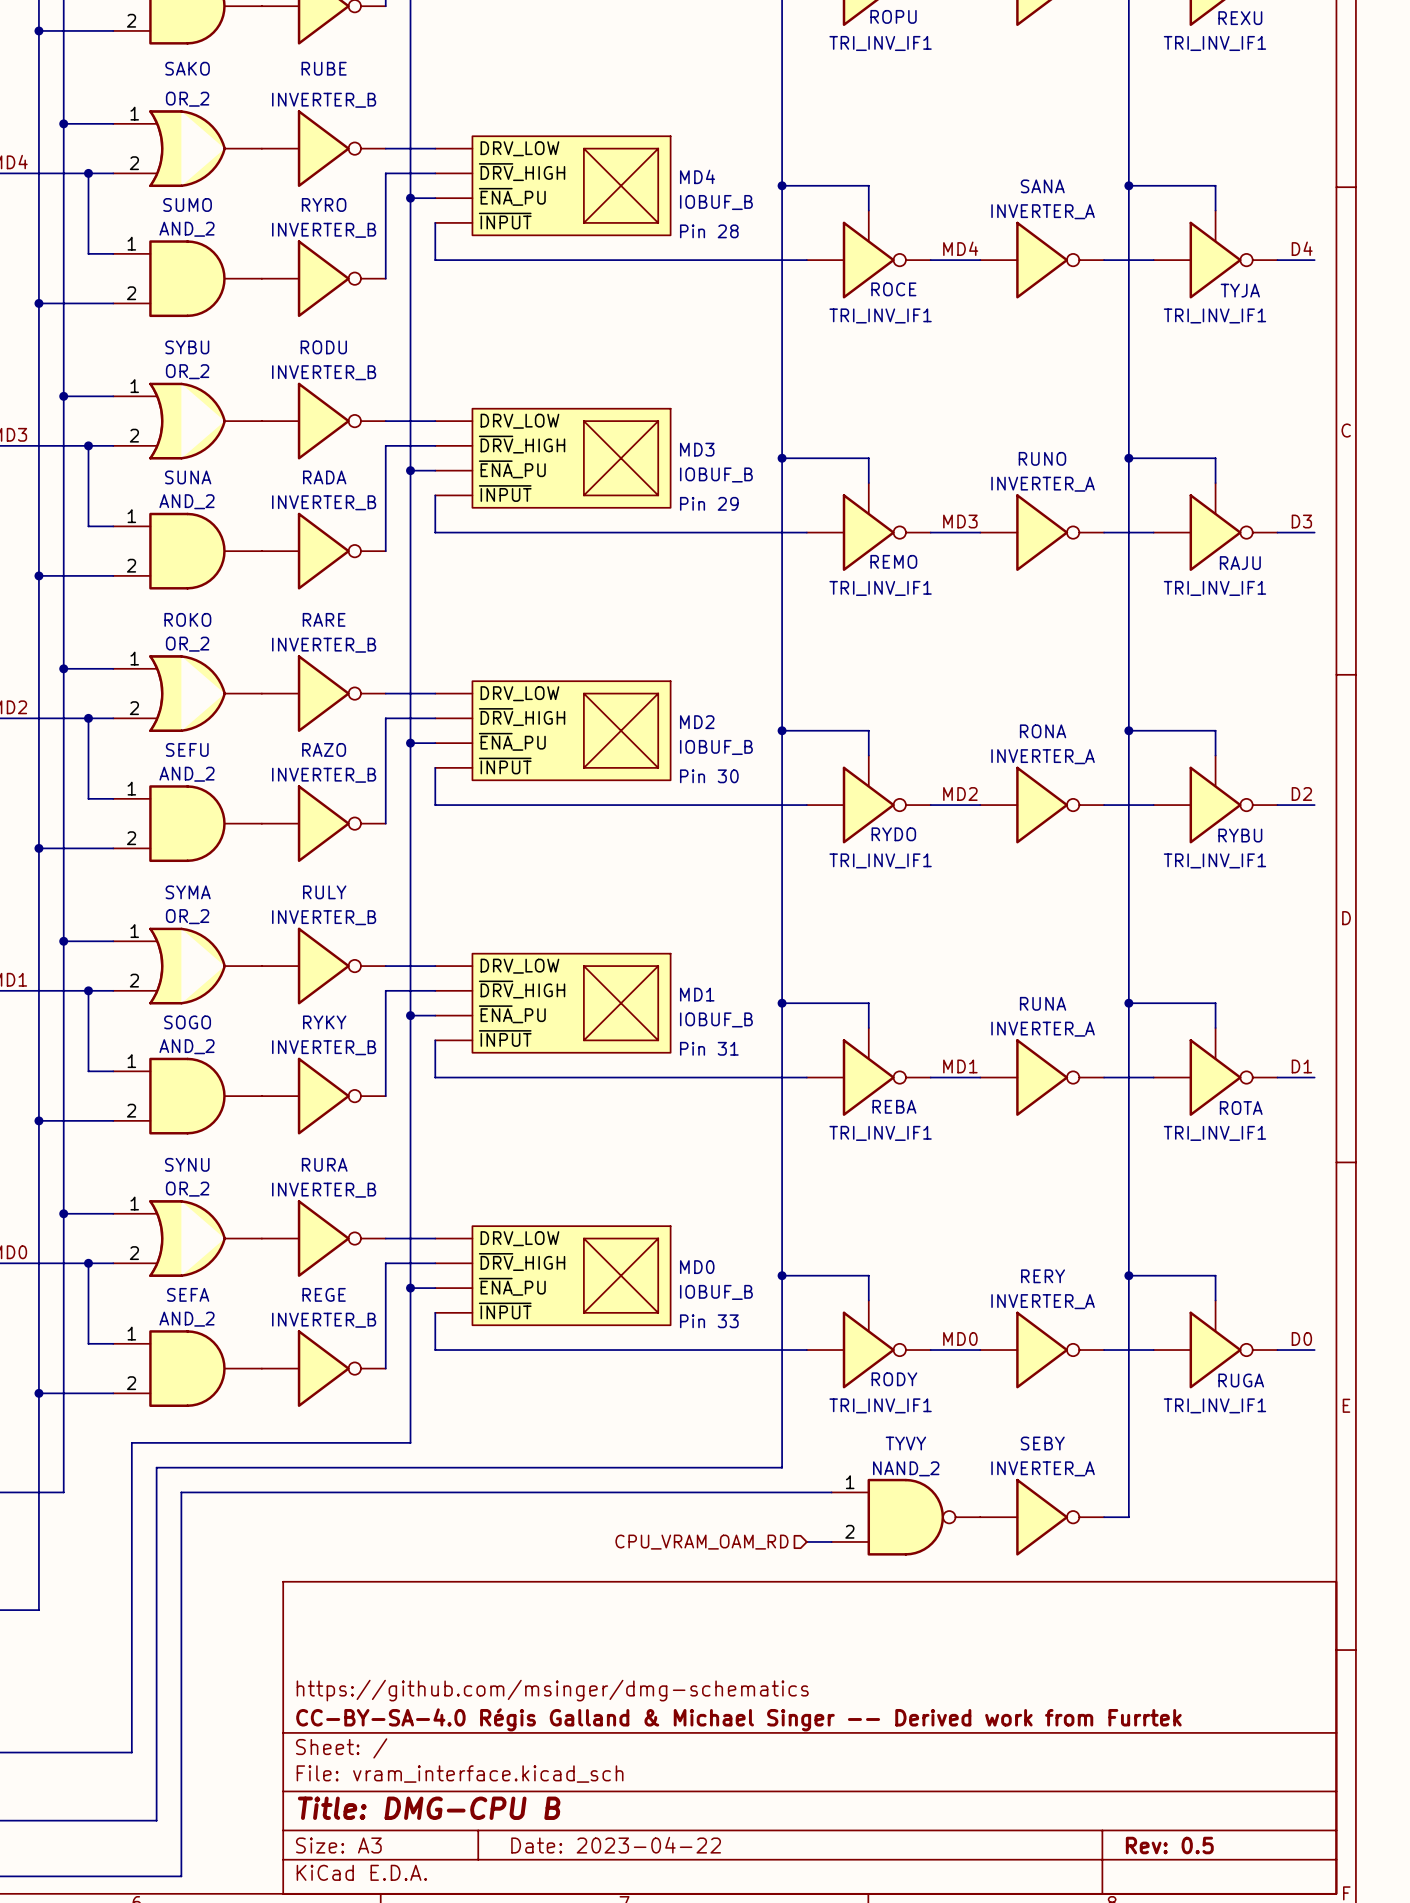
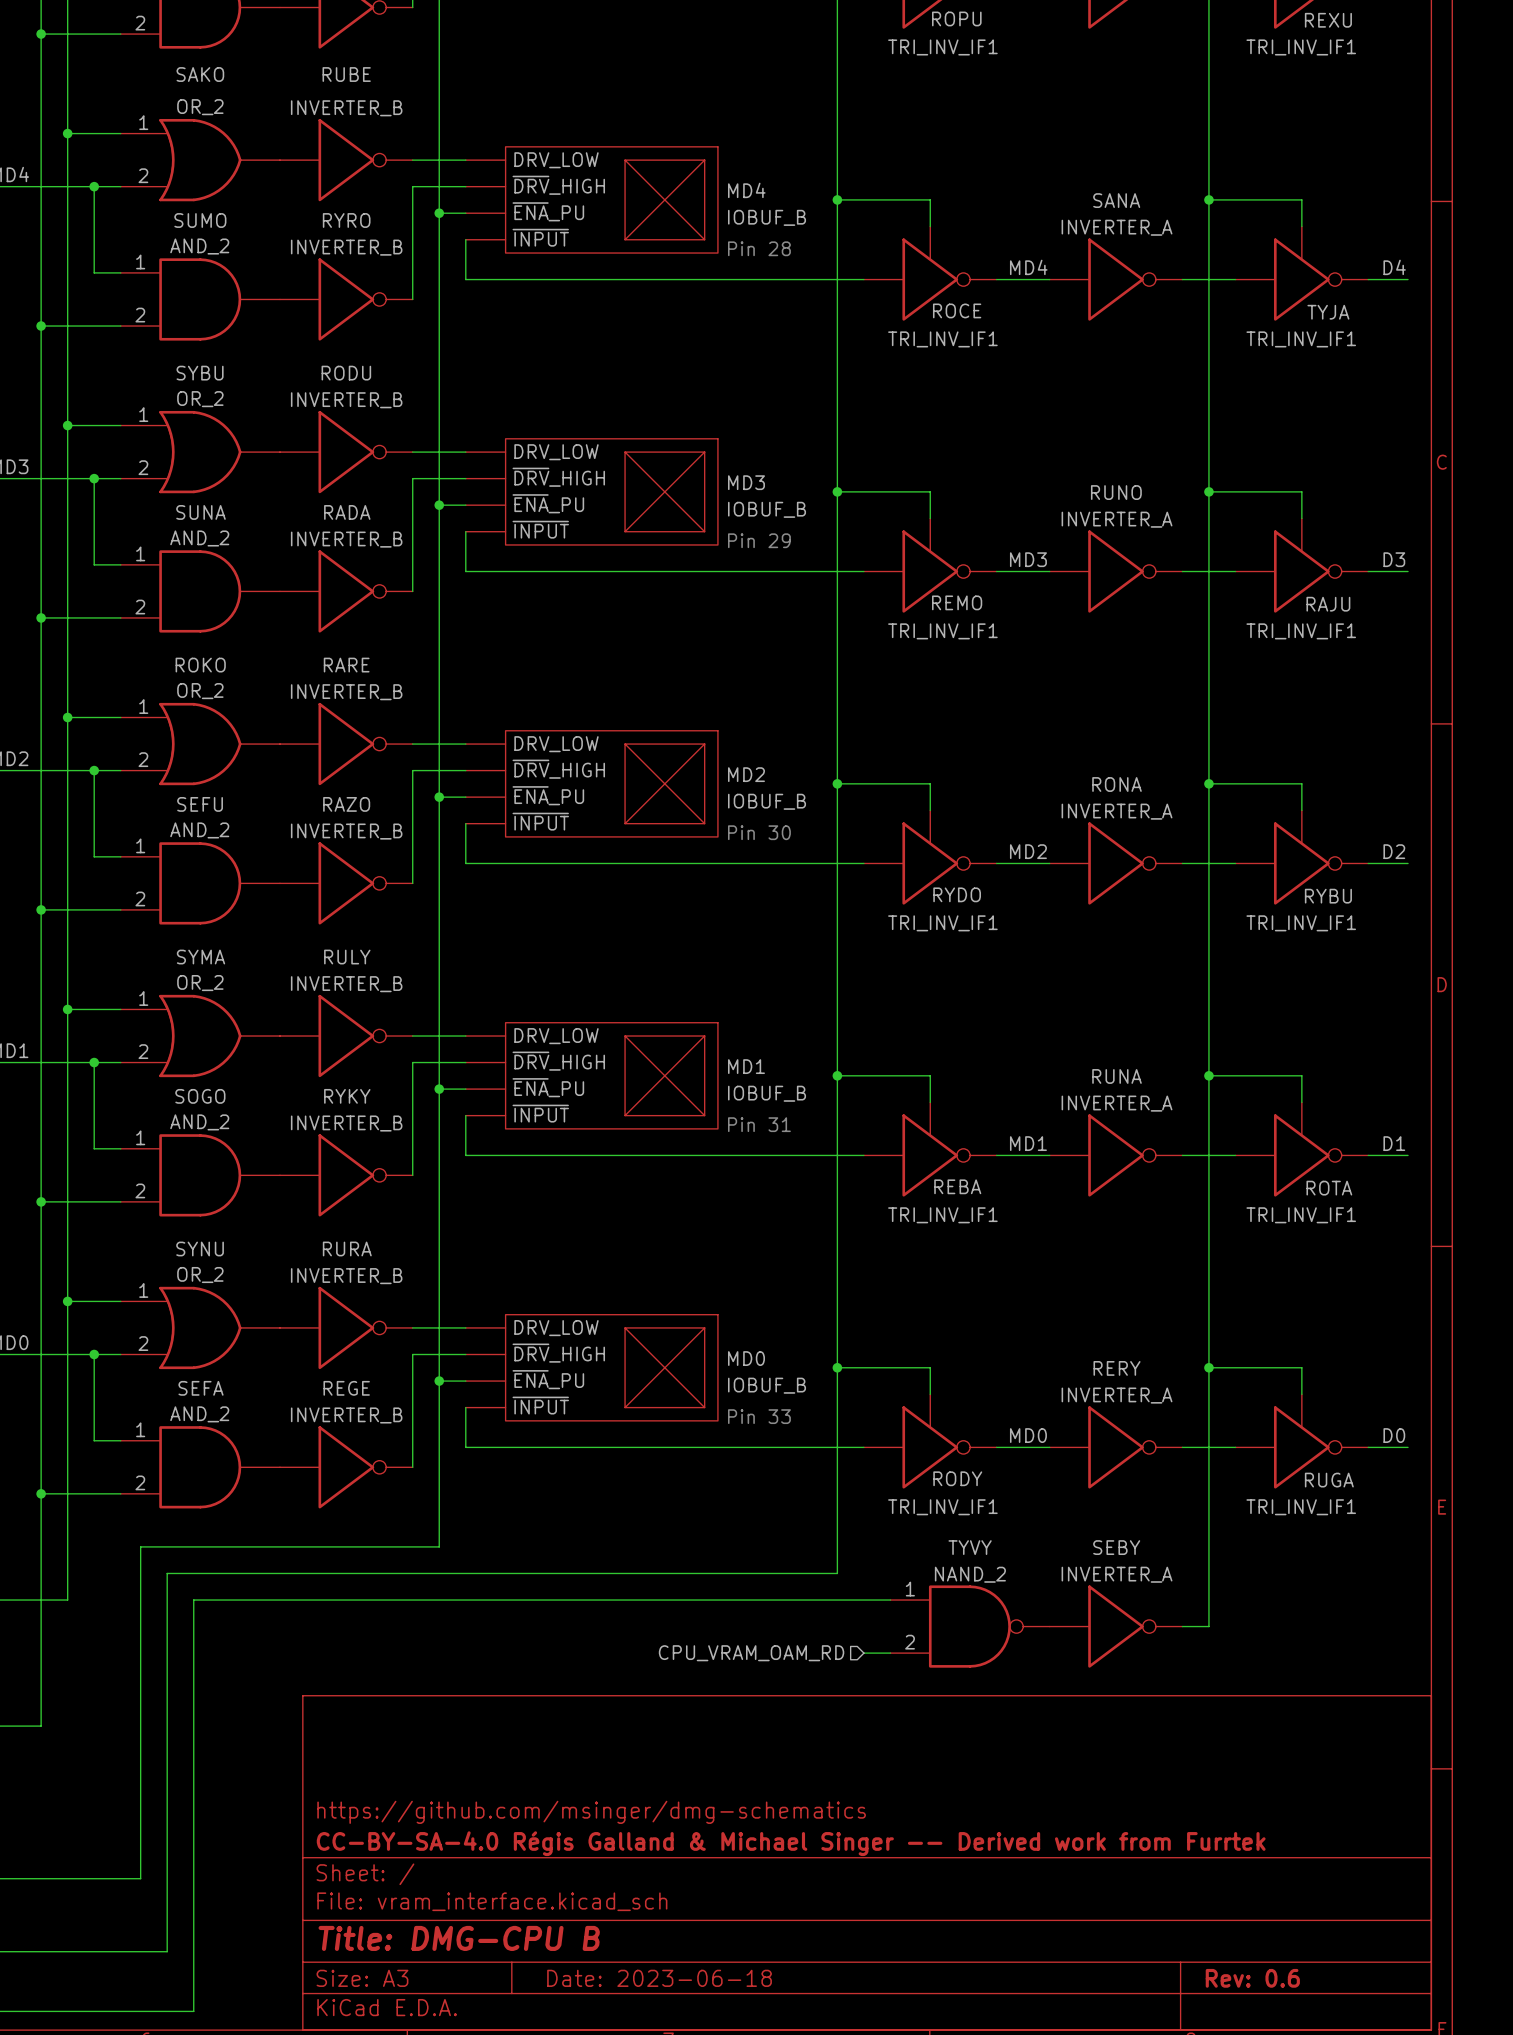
title block: Date: 2023-04-22 (616, 1845) -> Date: 2023-06-18 (659, 1978)
title block: Rev: 0.5 (1169, 1845) -> Rev: 0.6 (1252, 1978)

